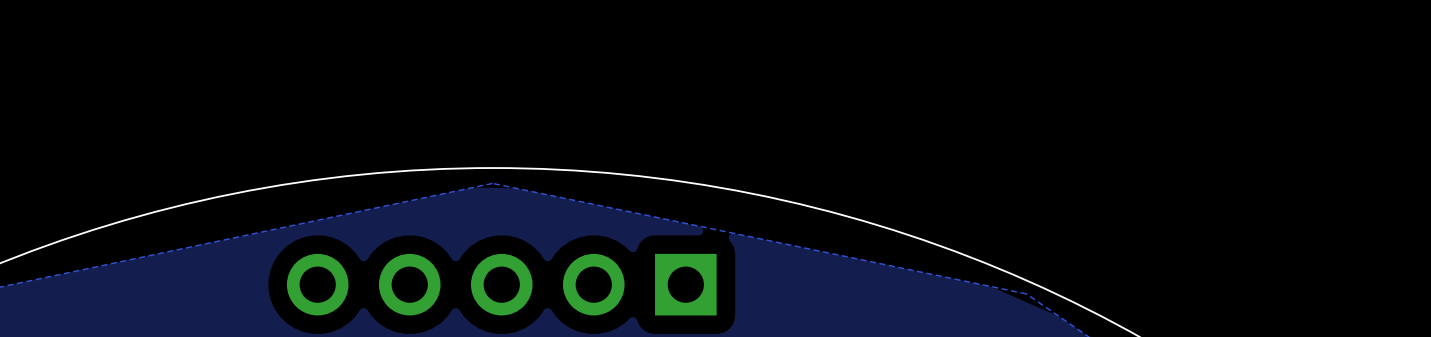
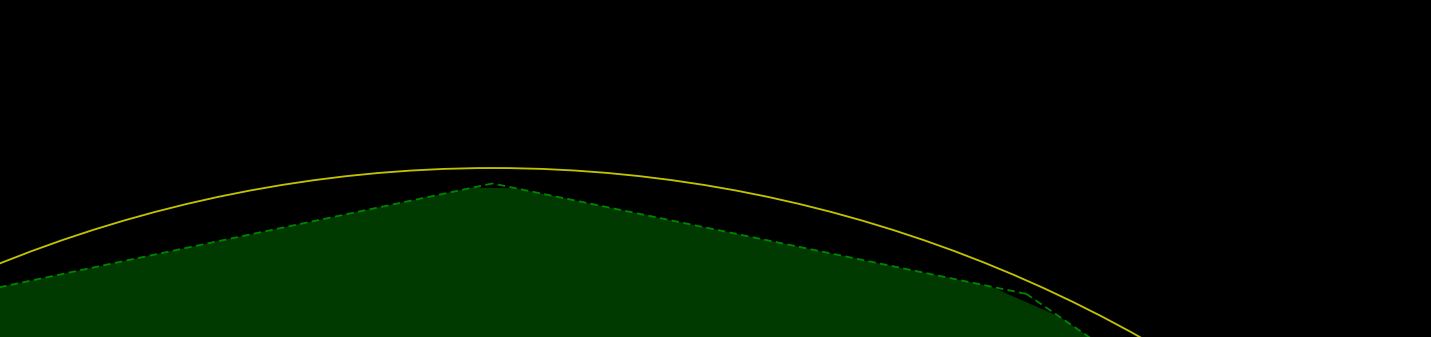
part: (501, 284) -> none

